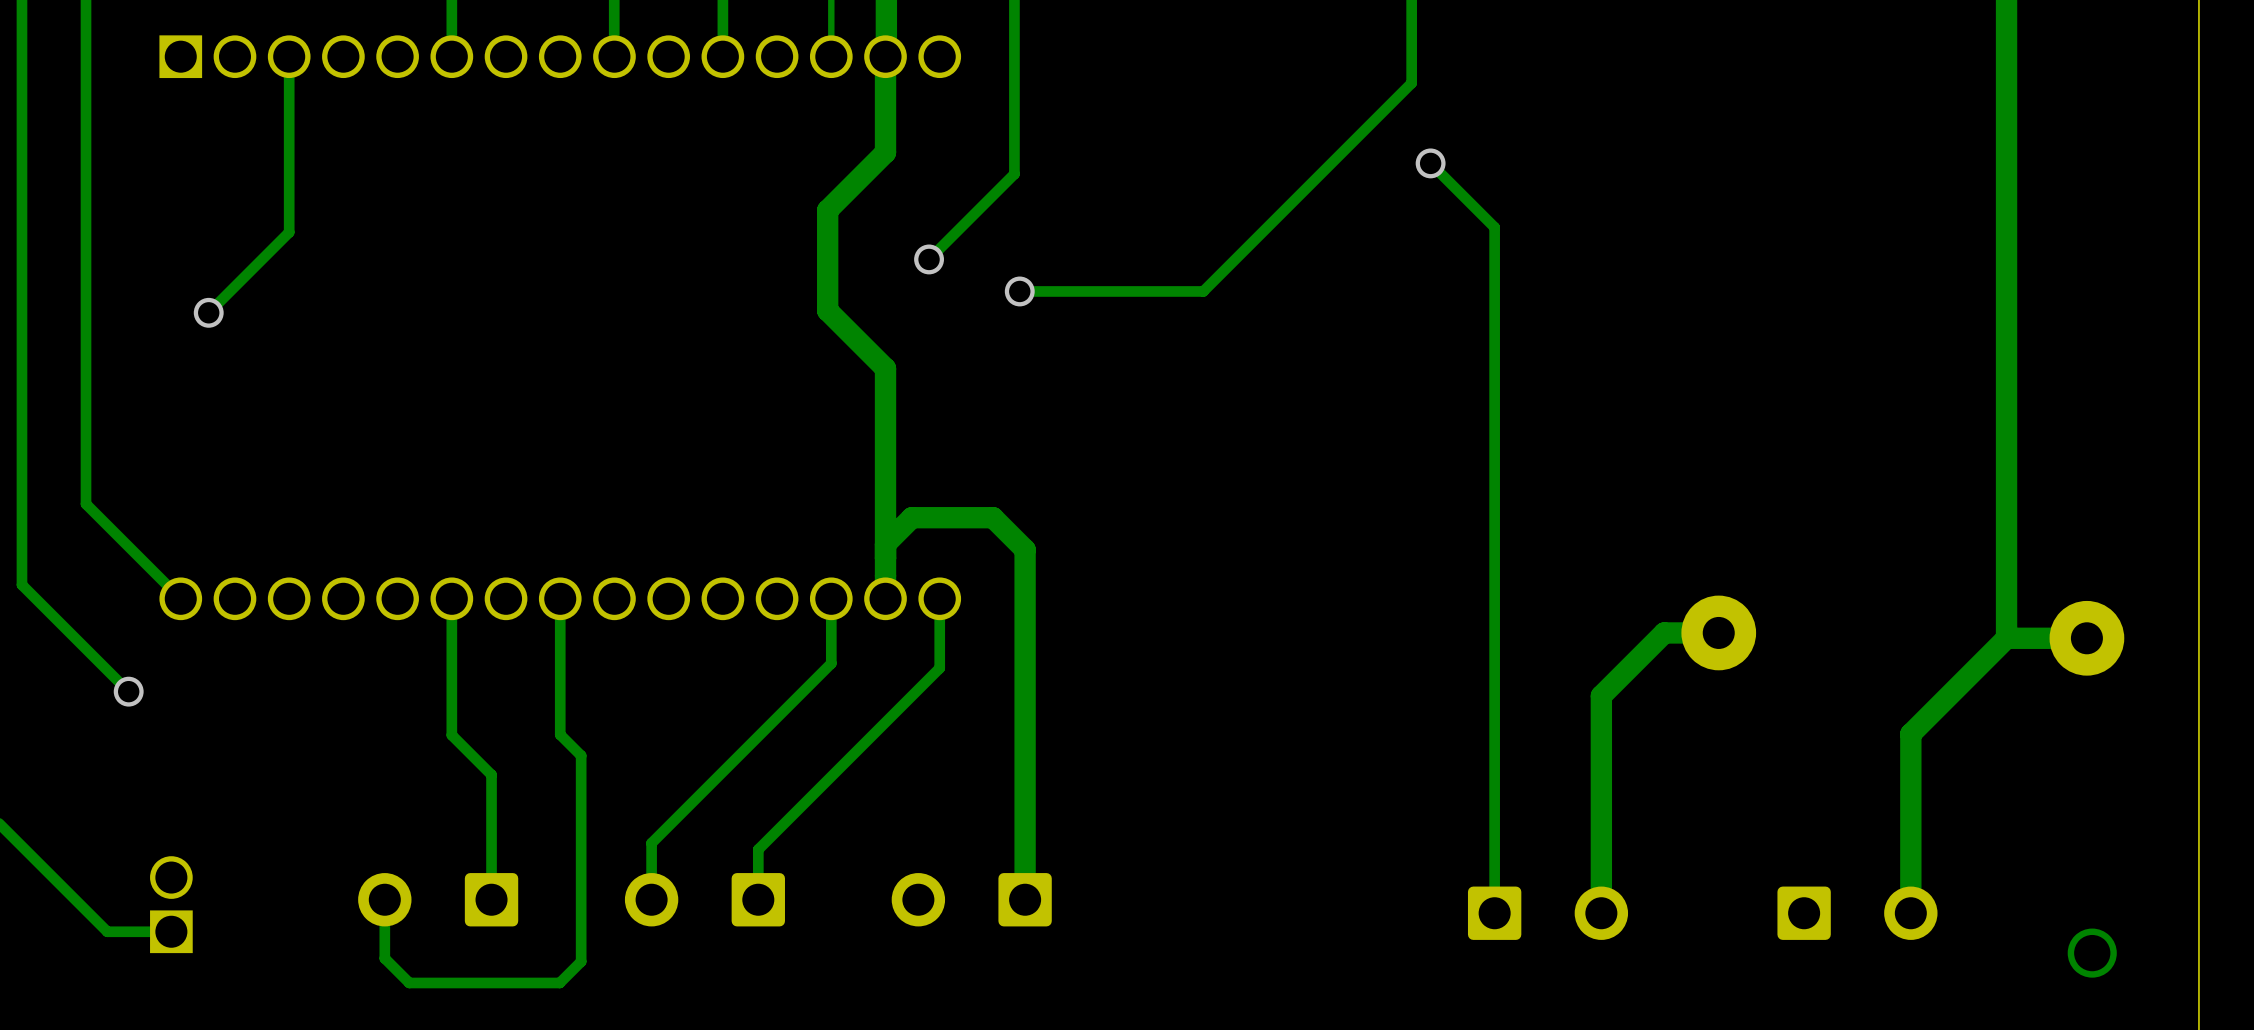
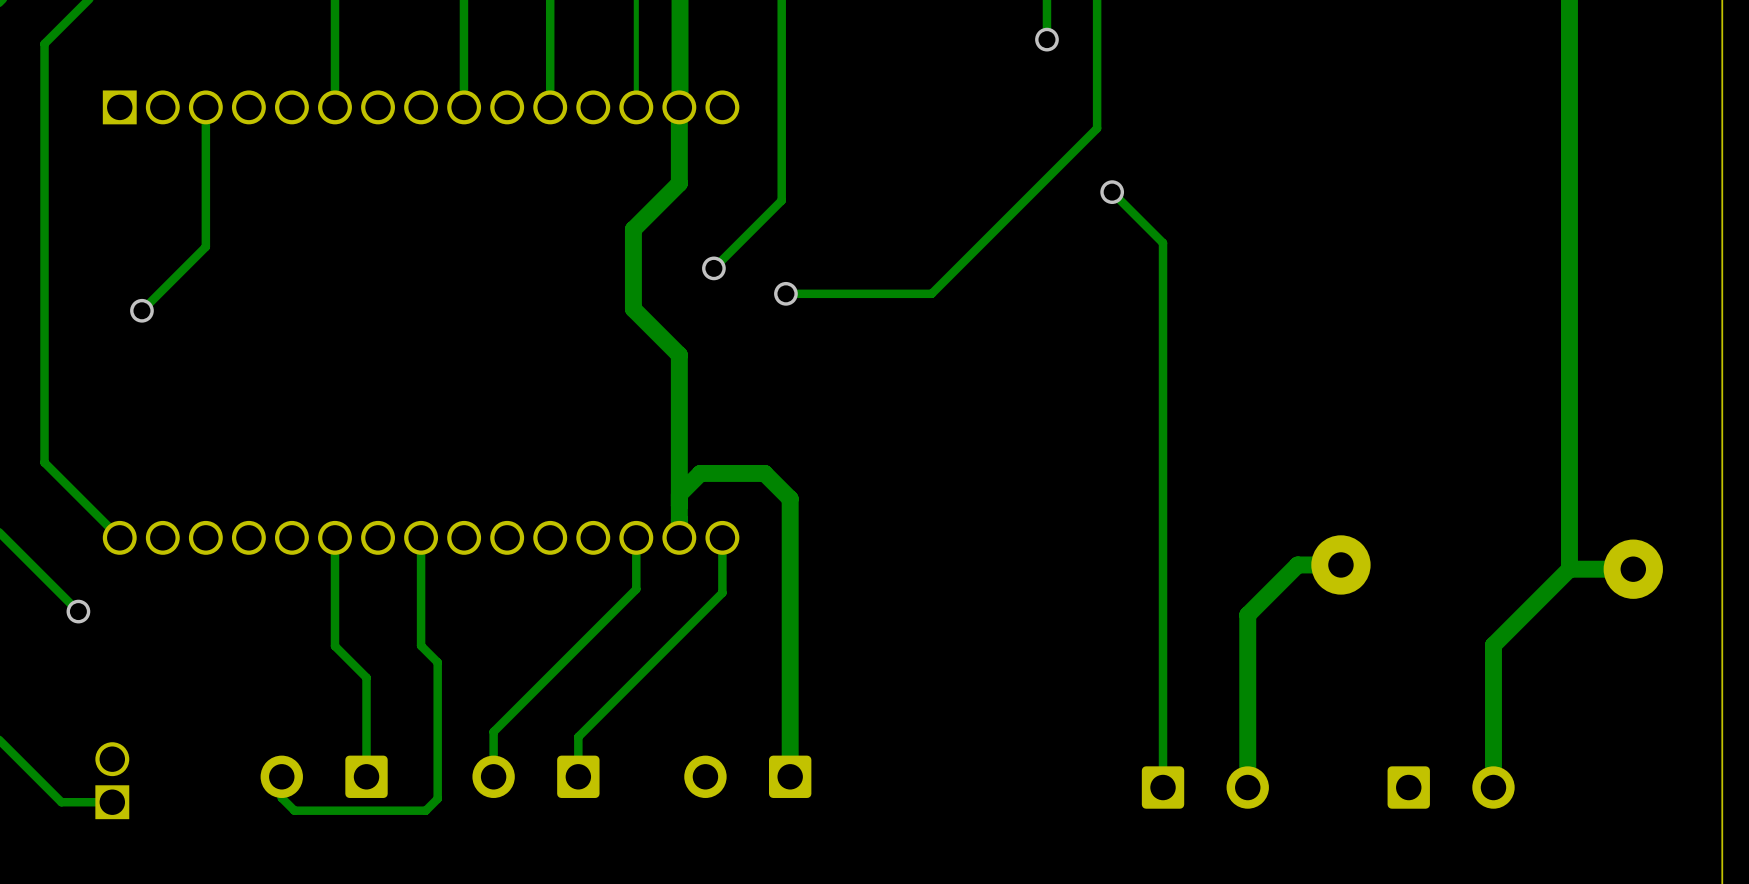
track: (384, 926) (384, 958) (409, 982) (559, 982) (581, 961) (581, 927) -> (281, 797) (294, 810) (425, 810) (437, 798)
drawing: [2067, 928, 2117, 978] -> none

